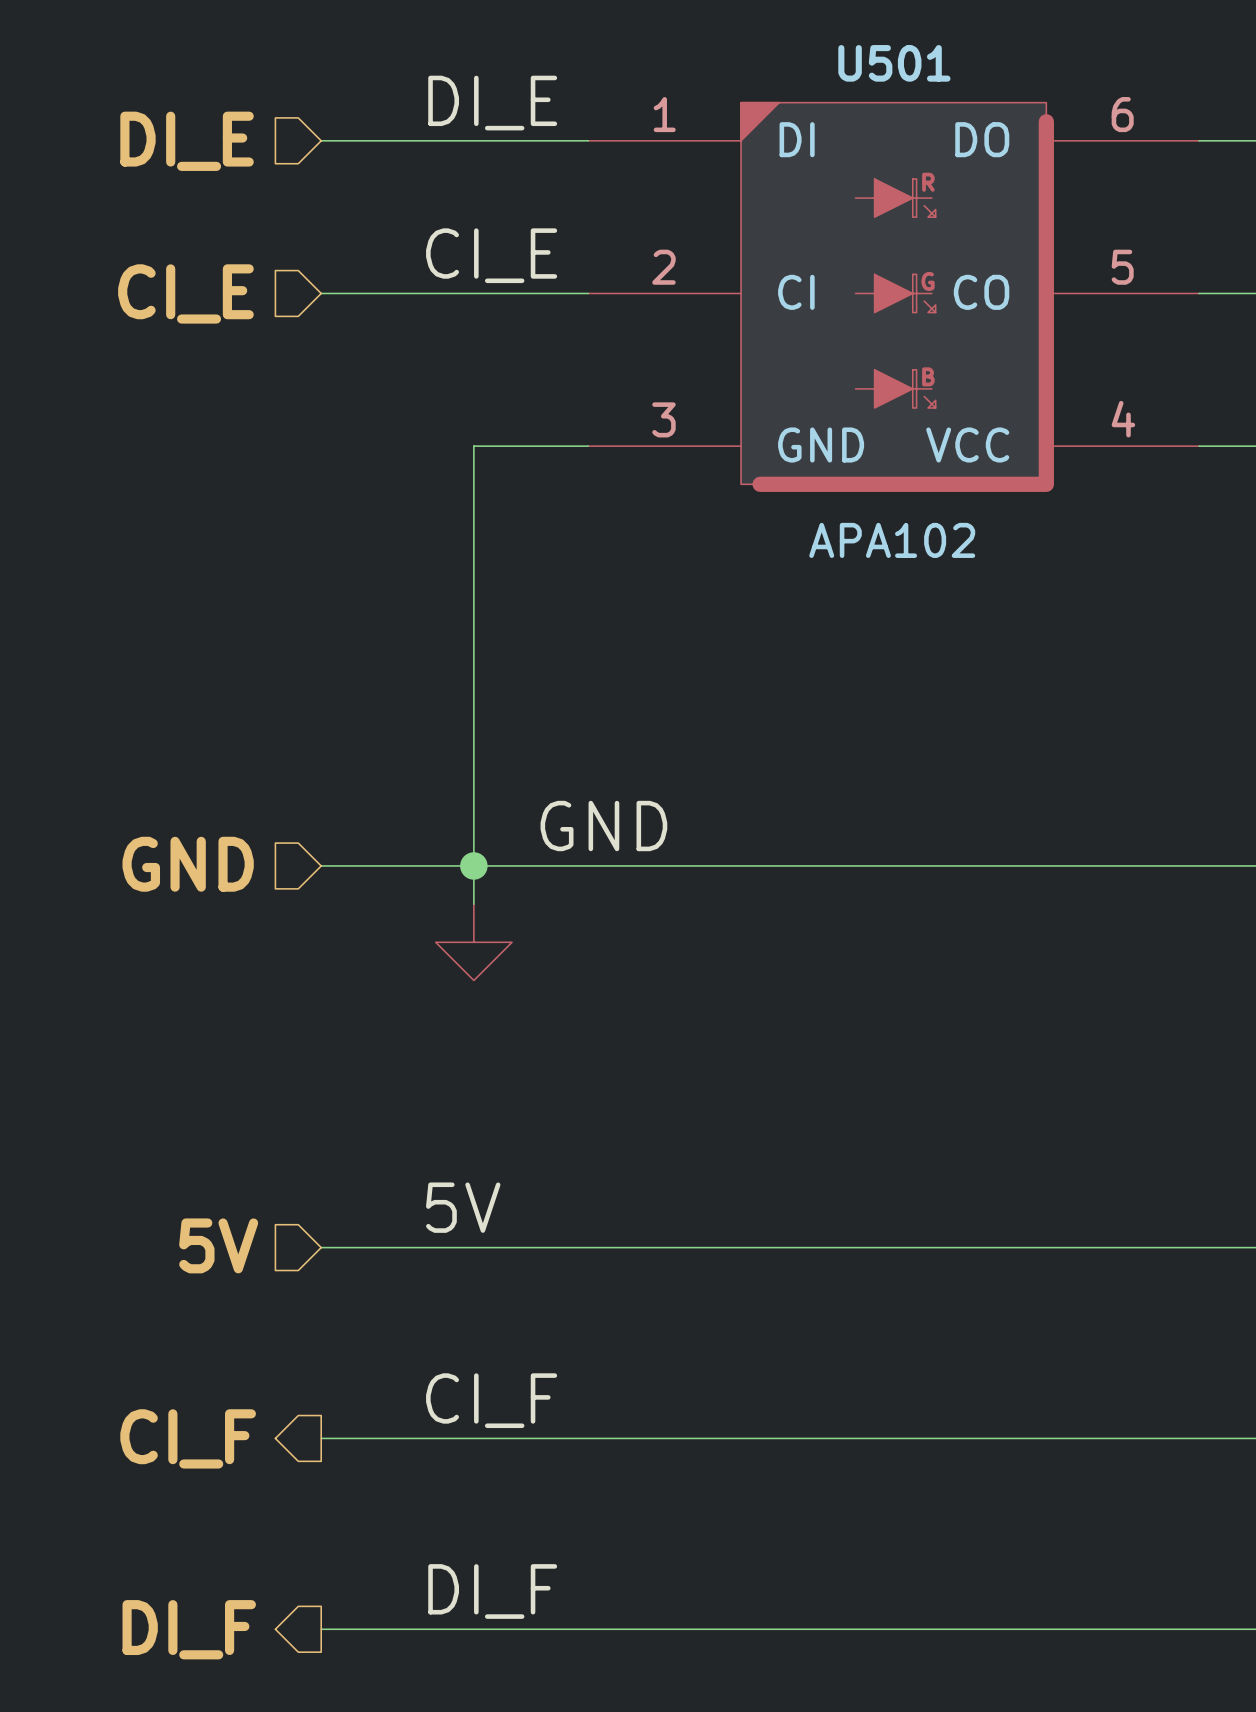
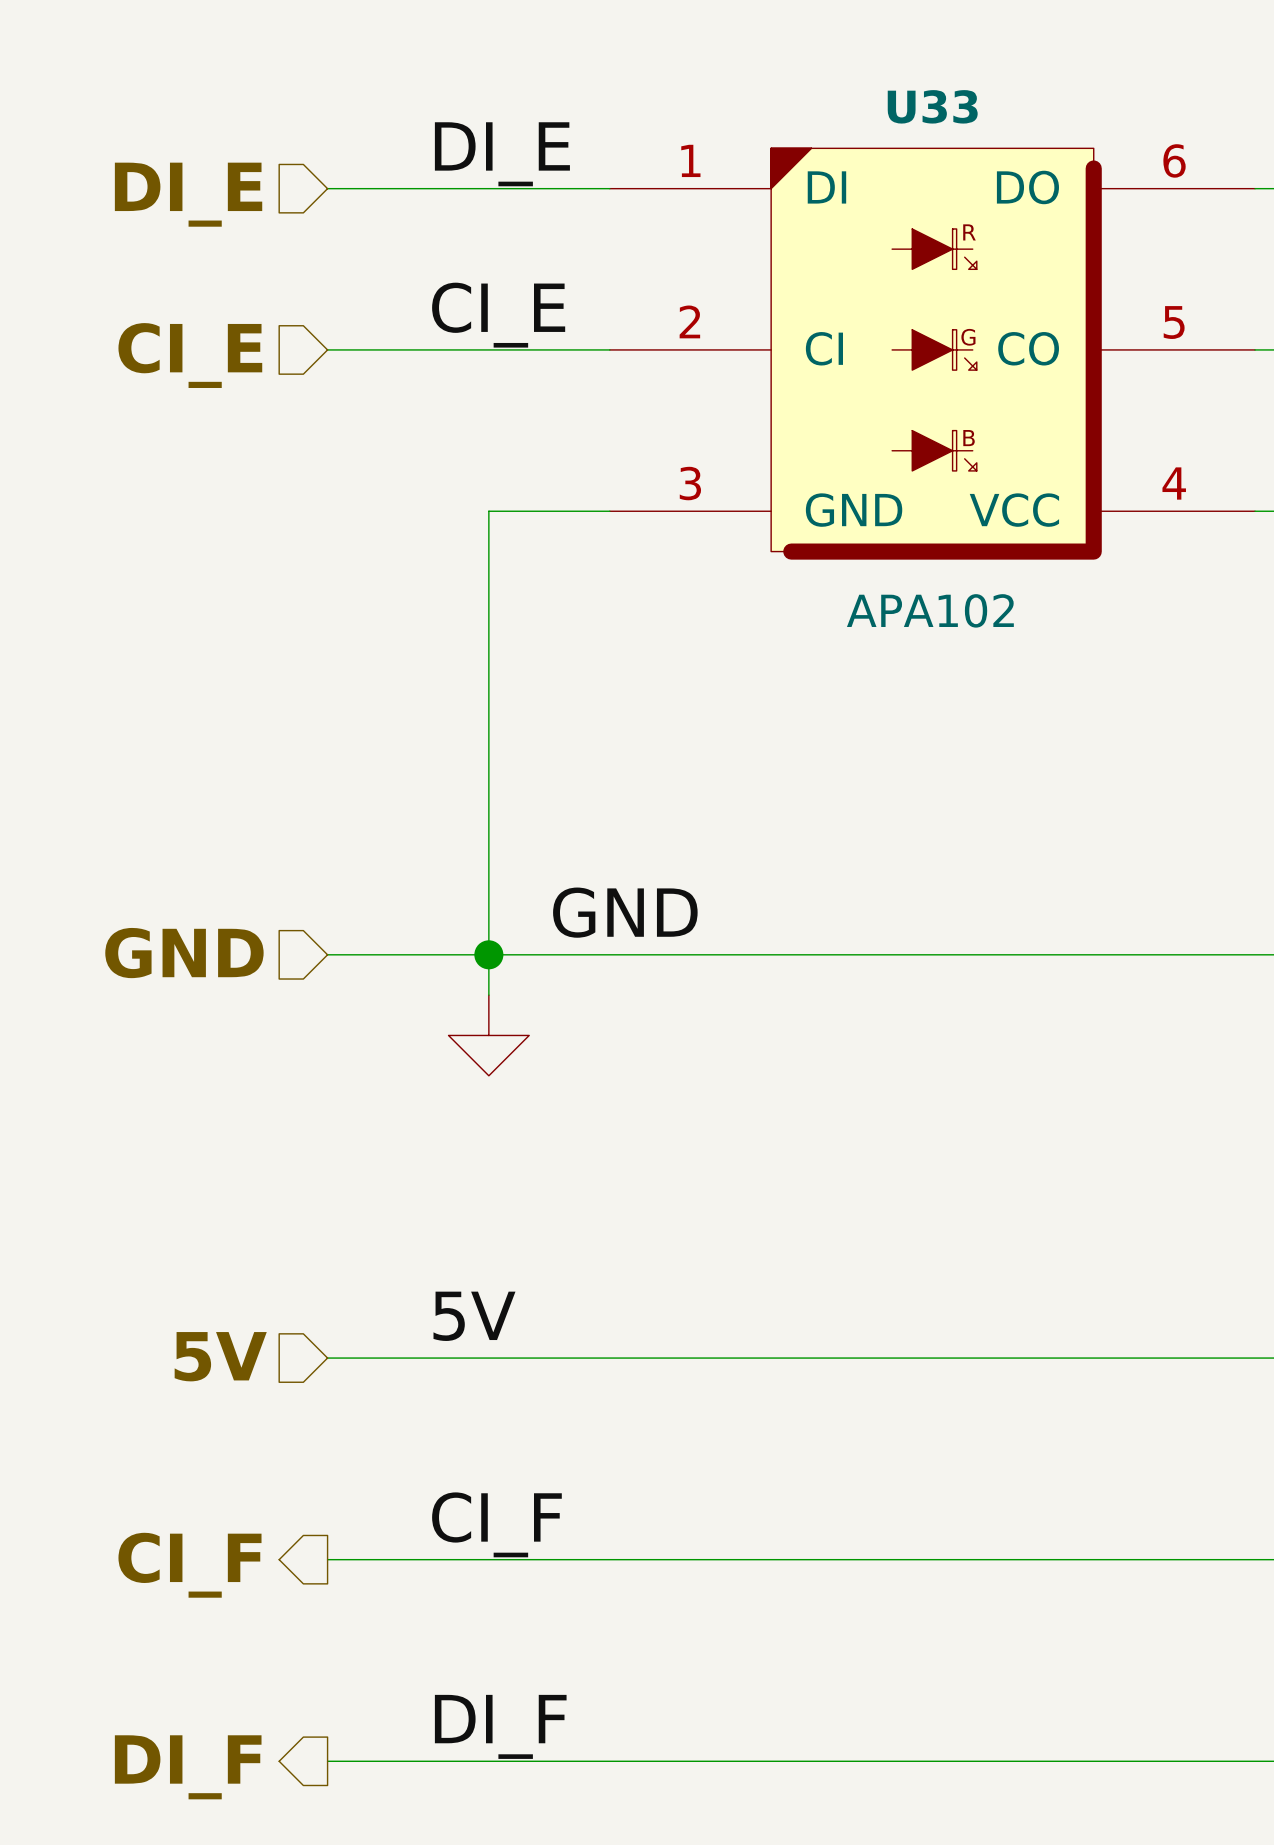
U501 name: U501 (894, 63) -> U33 (932, 106)

